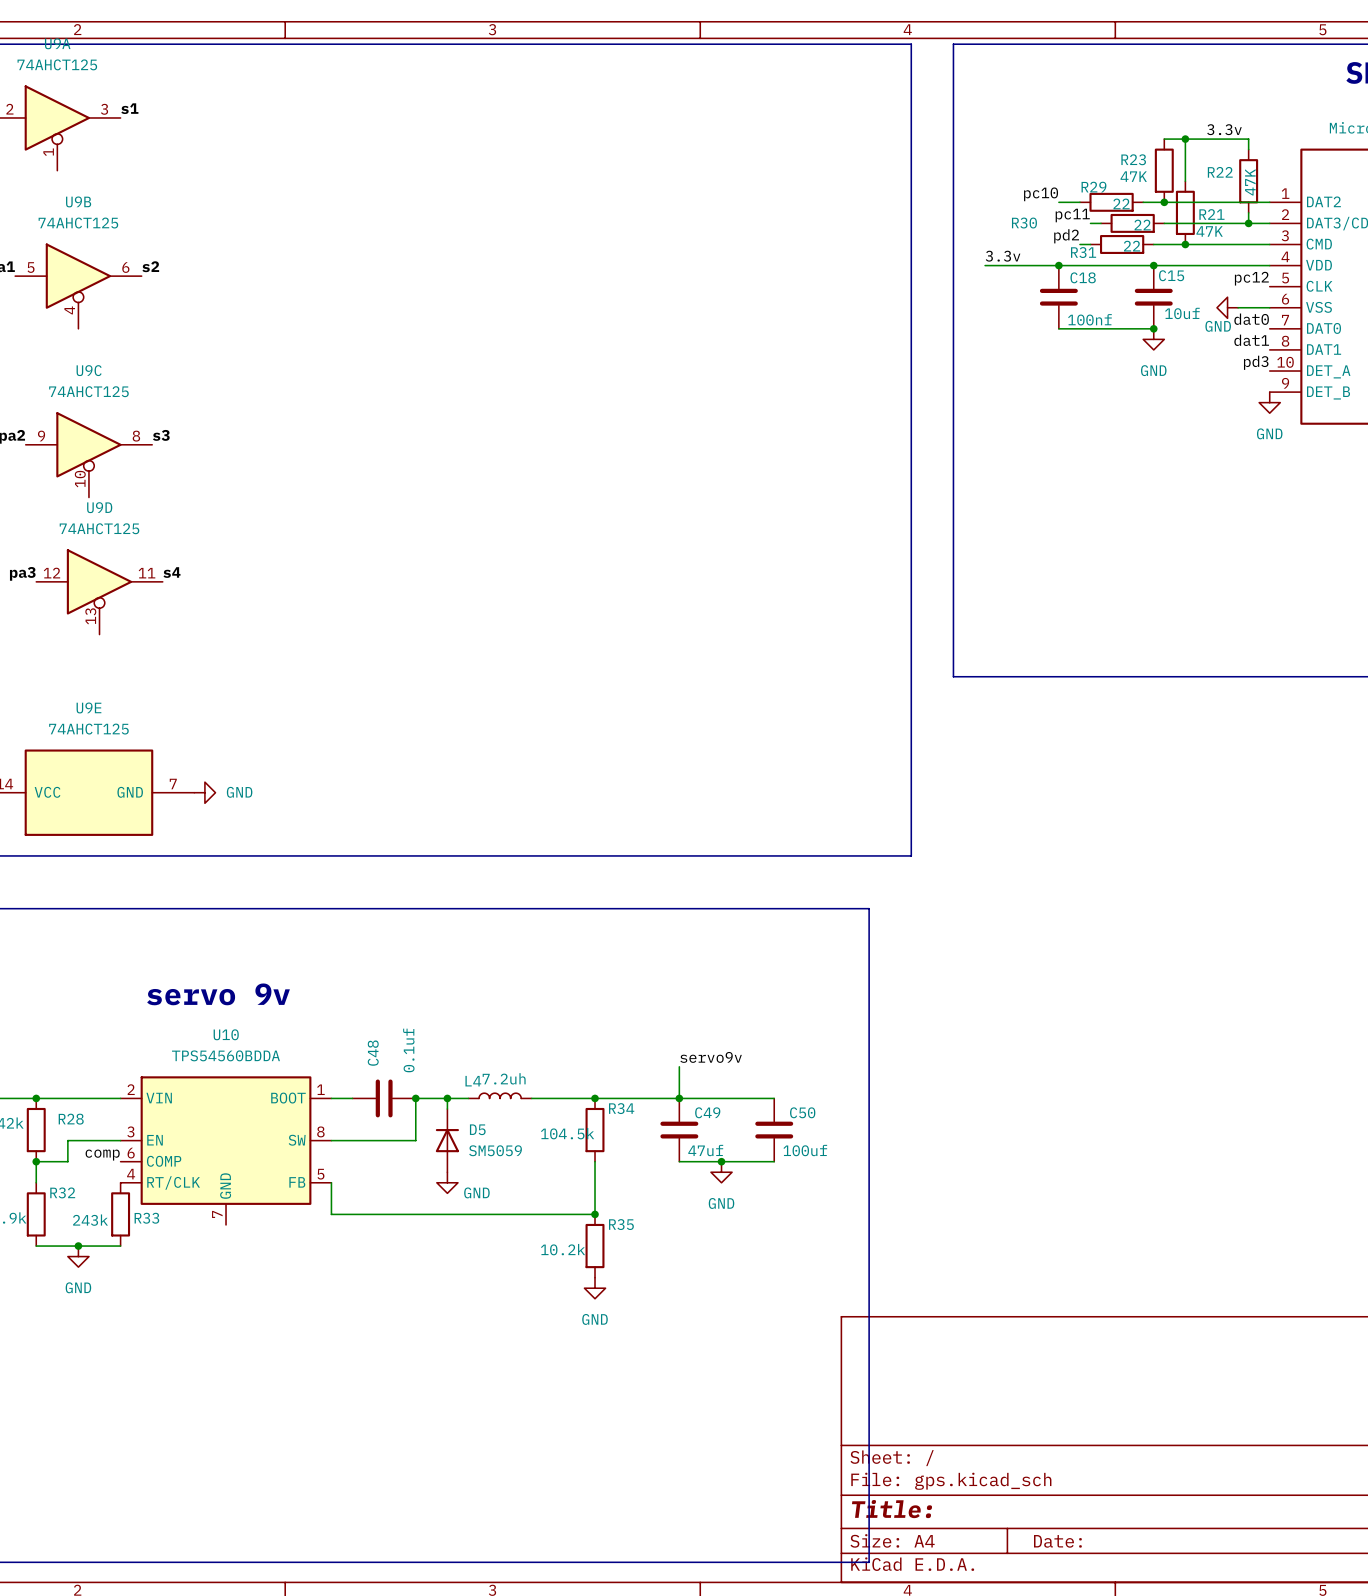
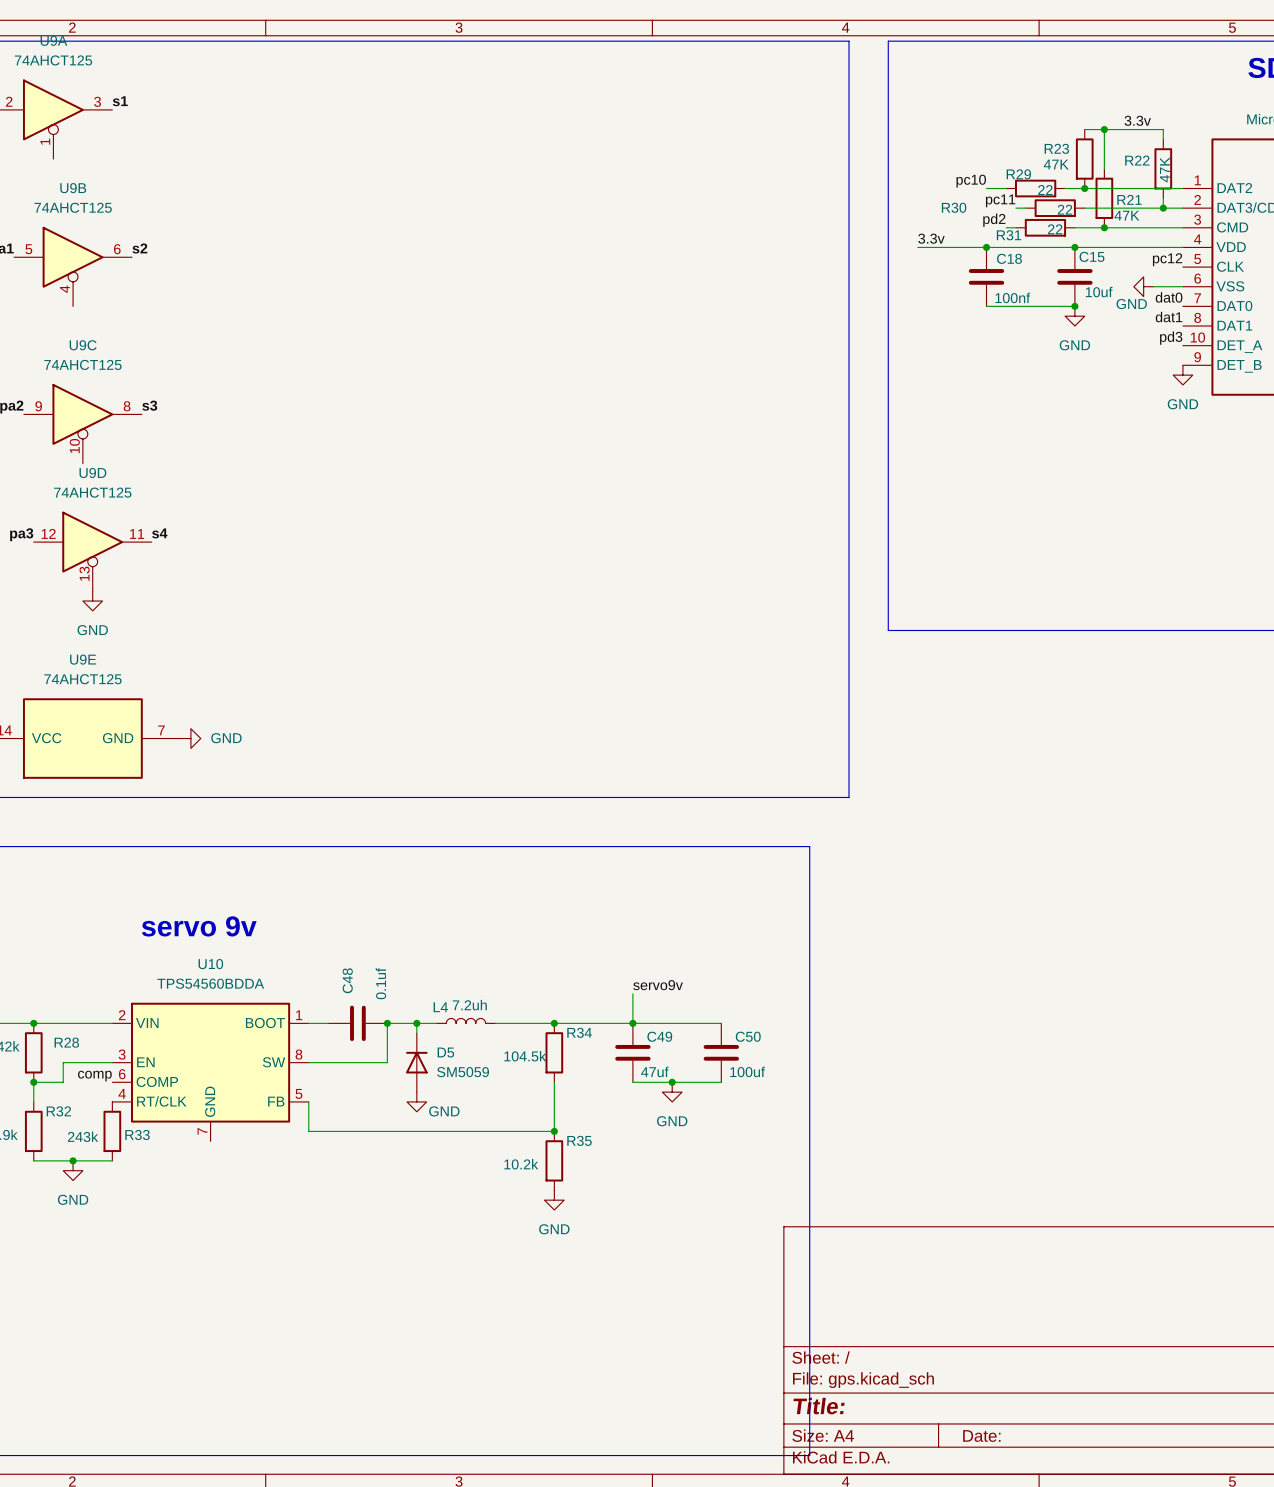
power symbol: none -> GND (92, 601)

